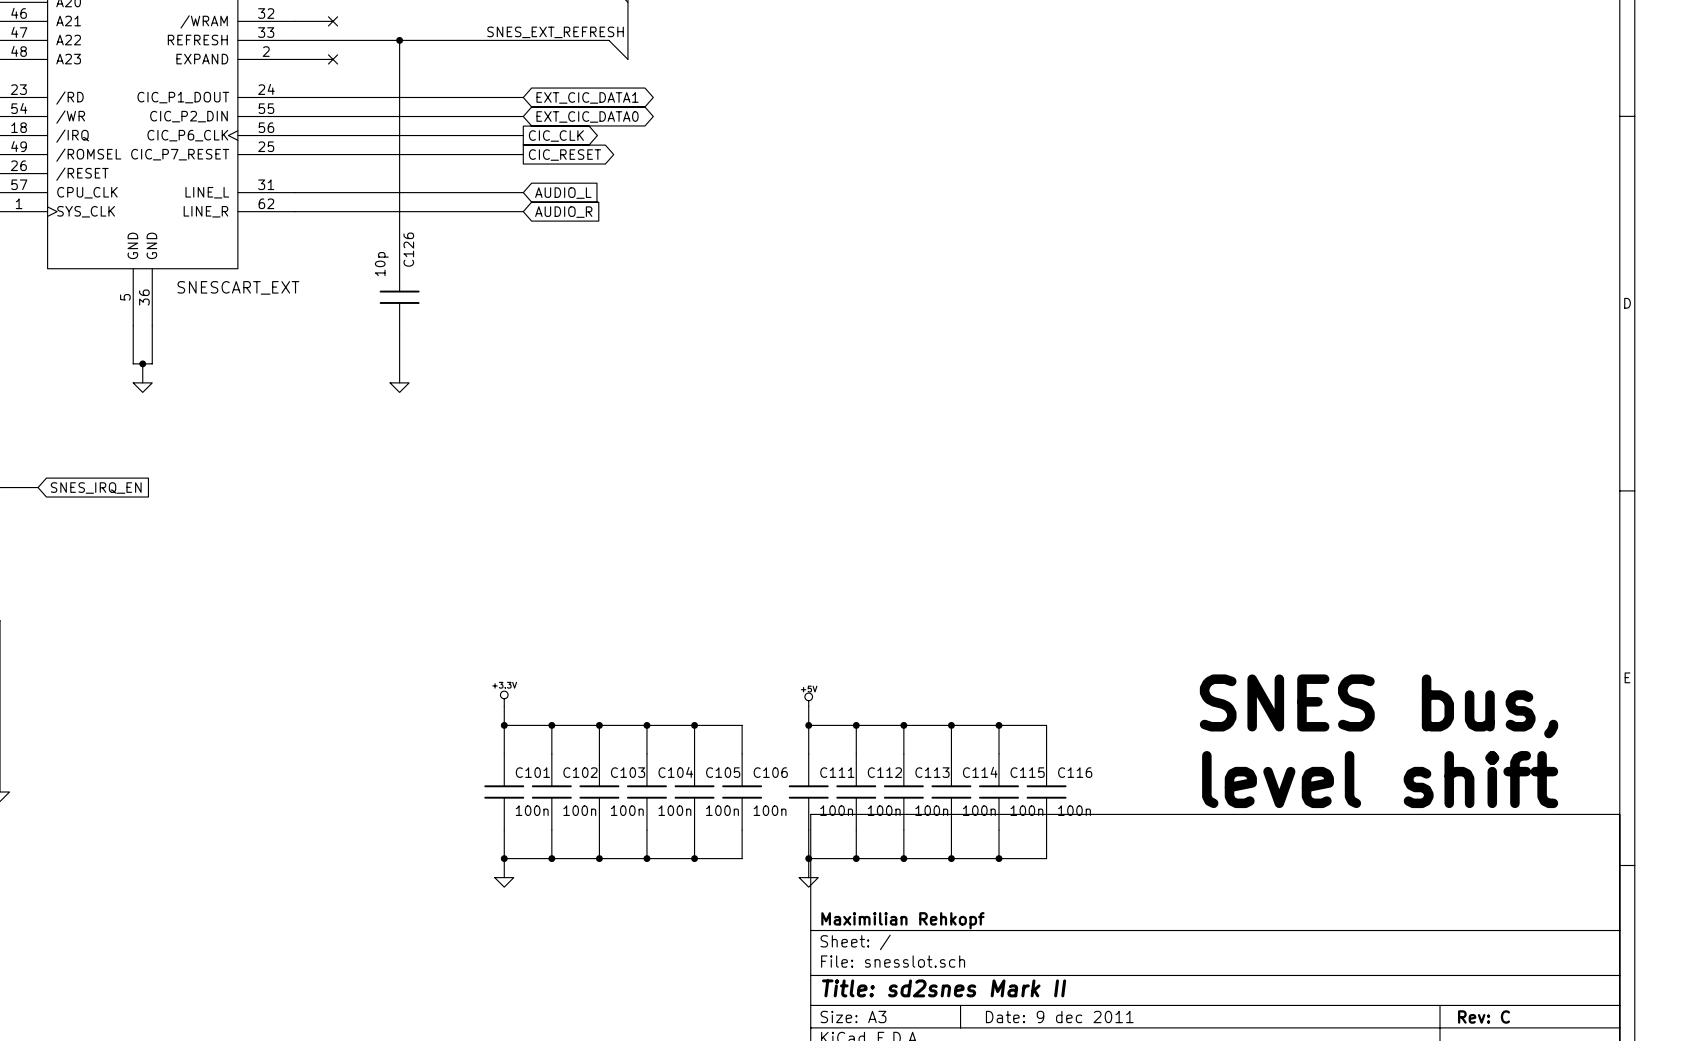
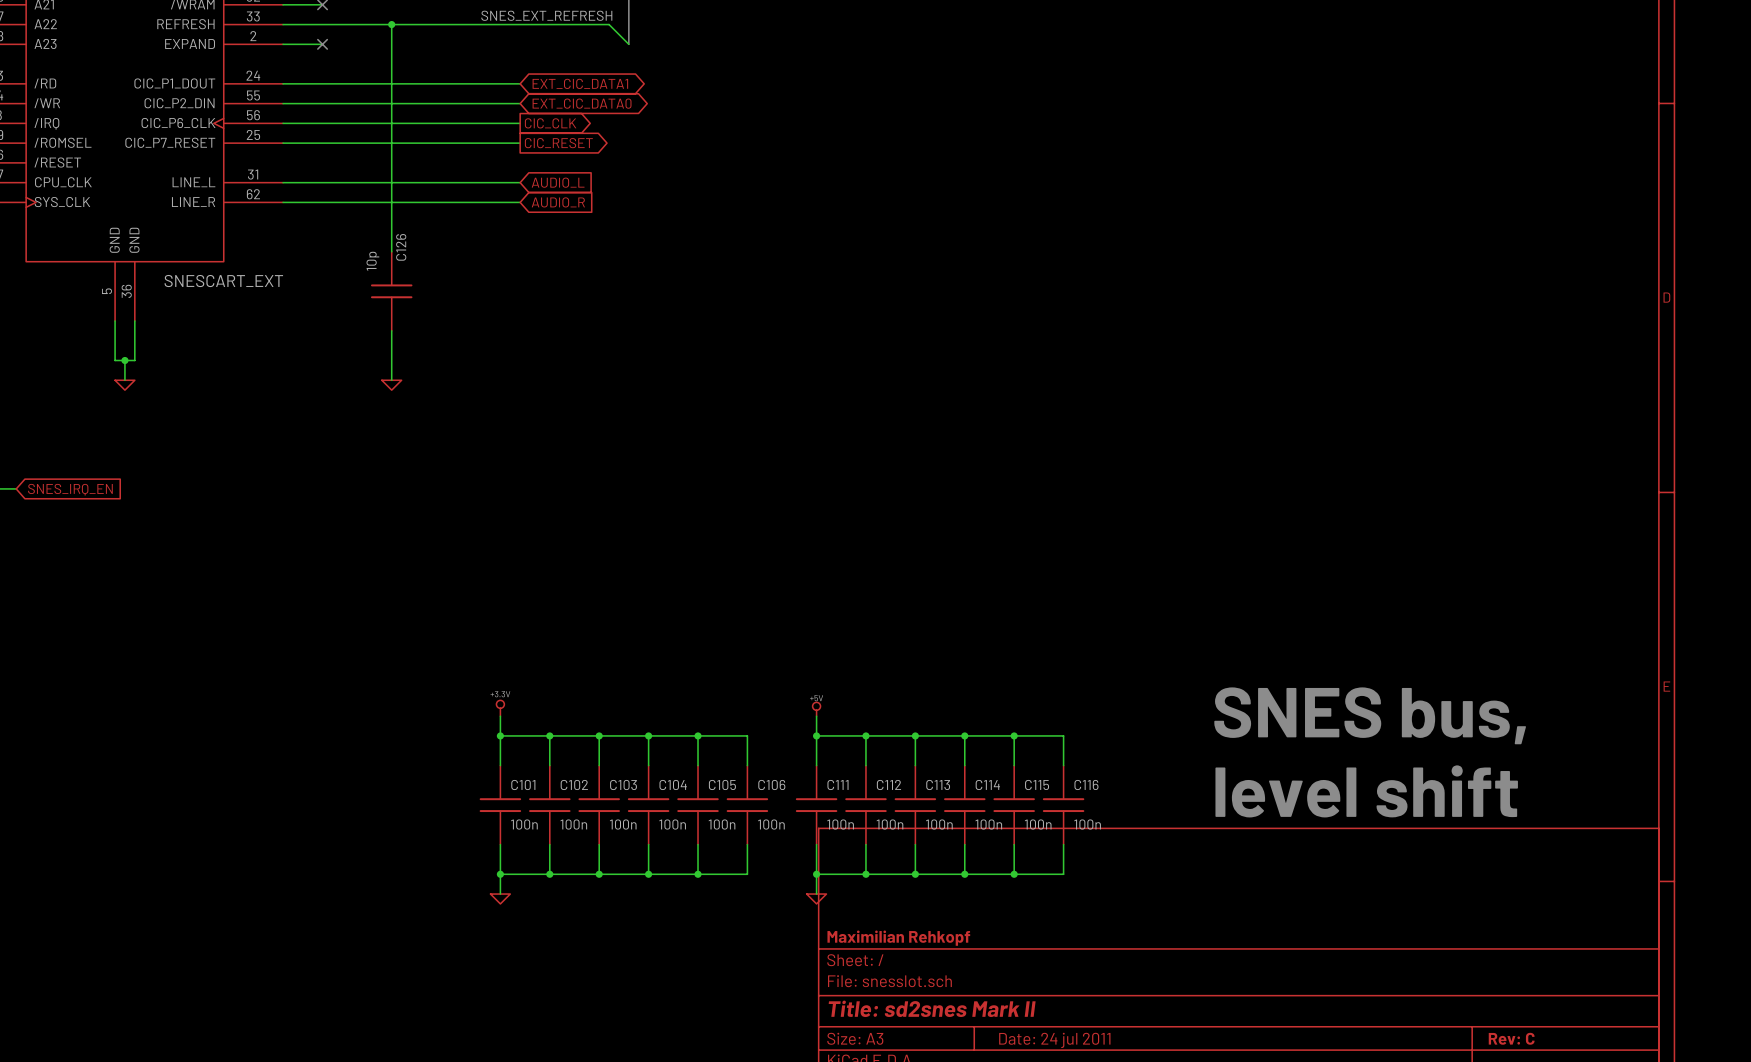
title block: Date: 9 dec 2011 (1059, 1016) -> Date: 24 jul 2011 (1054, 1040)

